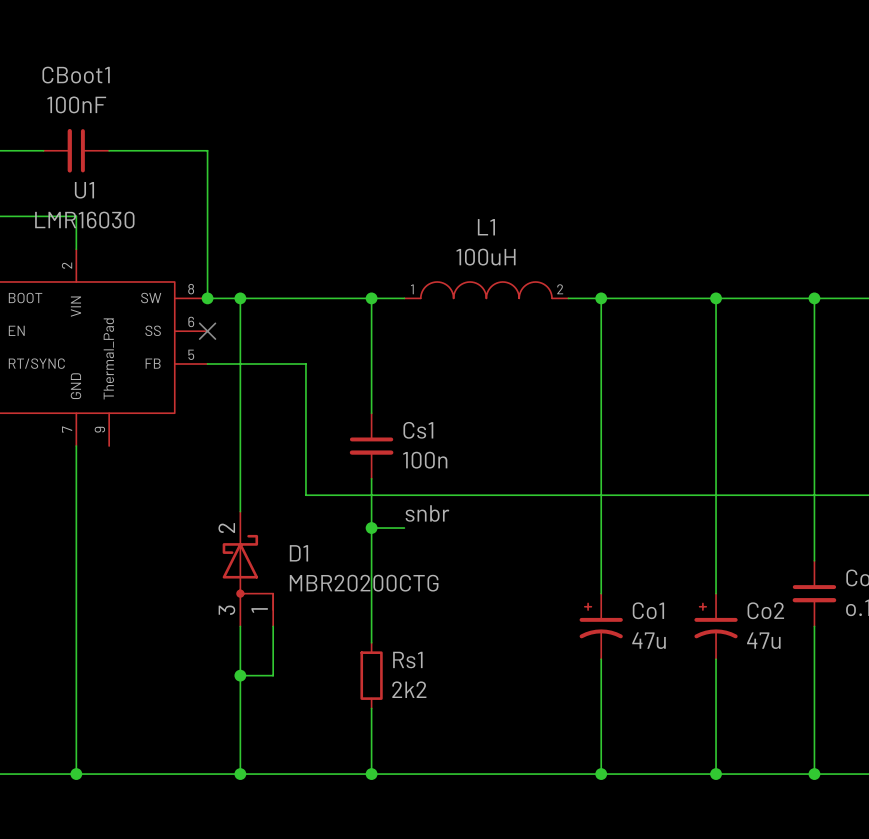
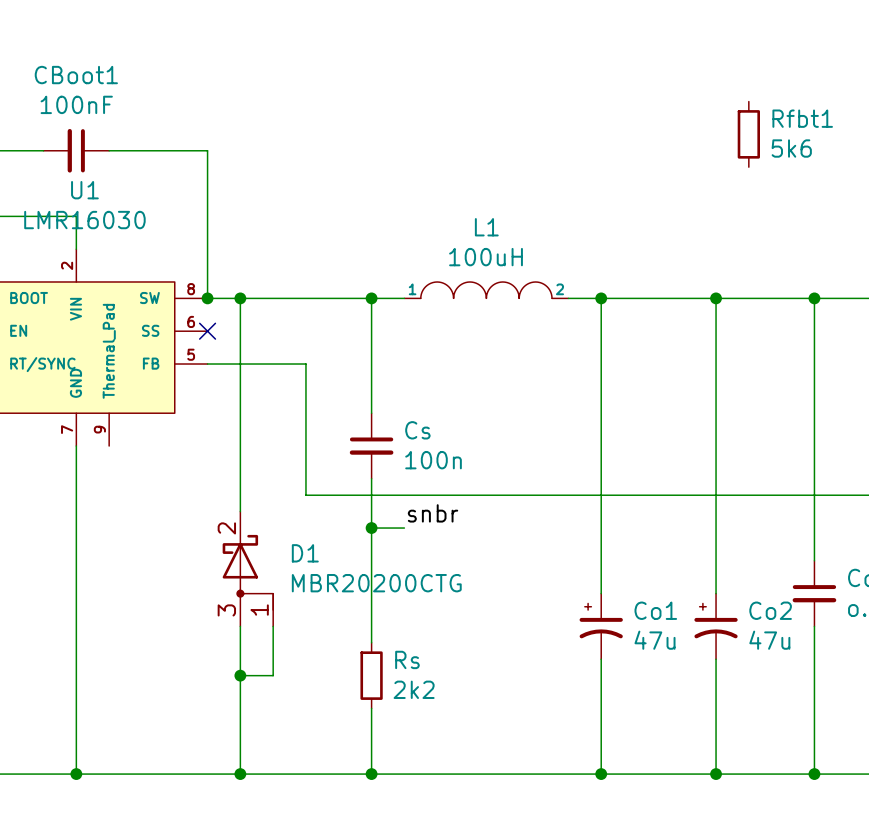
Rfbt1: none -> 5k6 (748, 134)
Cs1 name: Cs1 (418, 430) -> Cs (417, 430)
Rs1 name: Rs1 (407, 660) -> Rs (407, 659)

